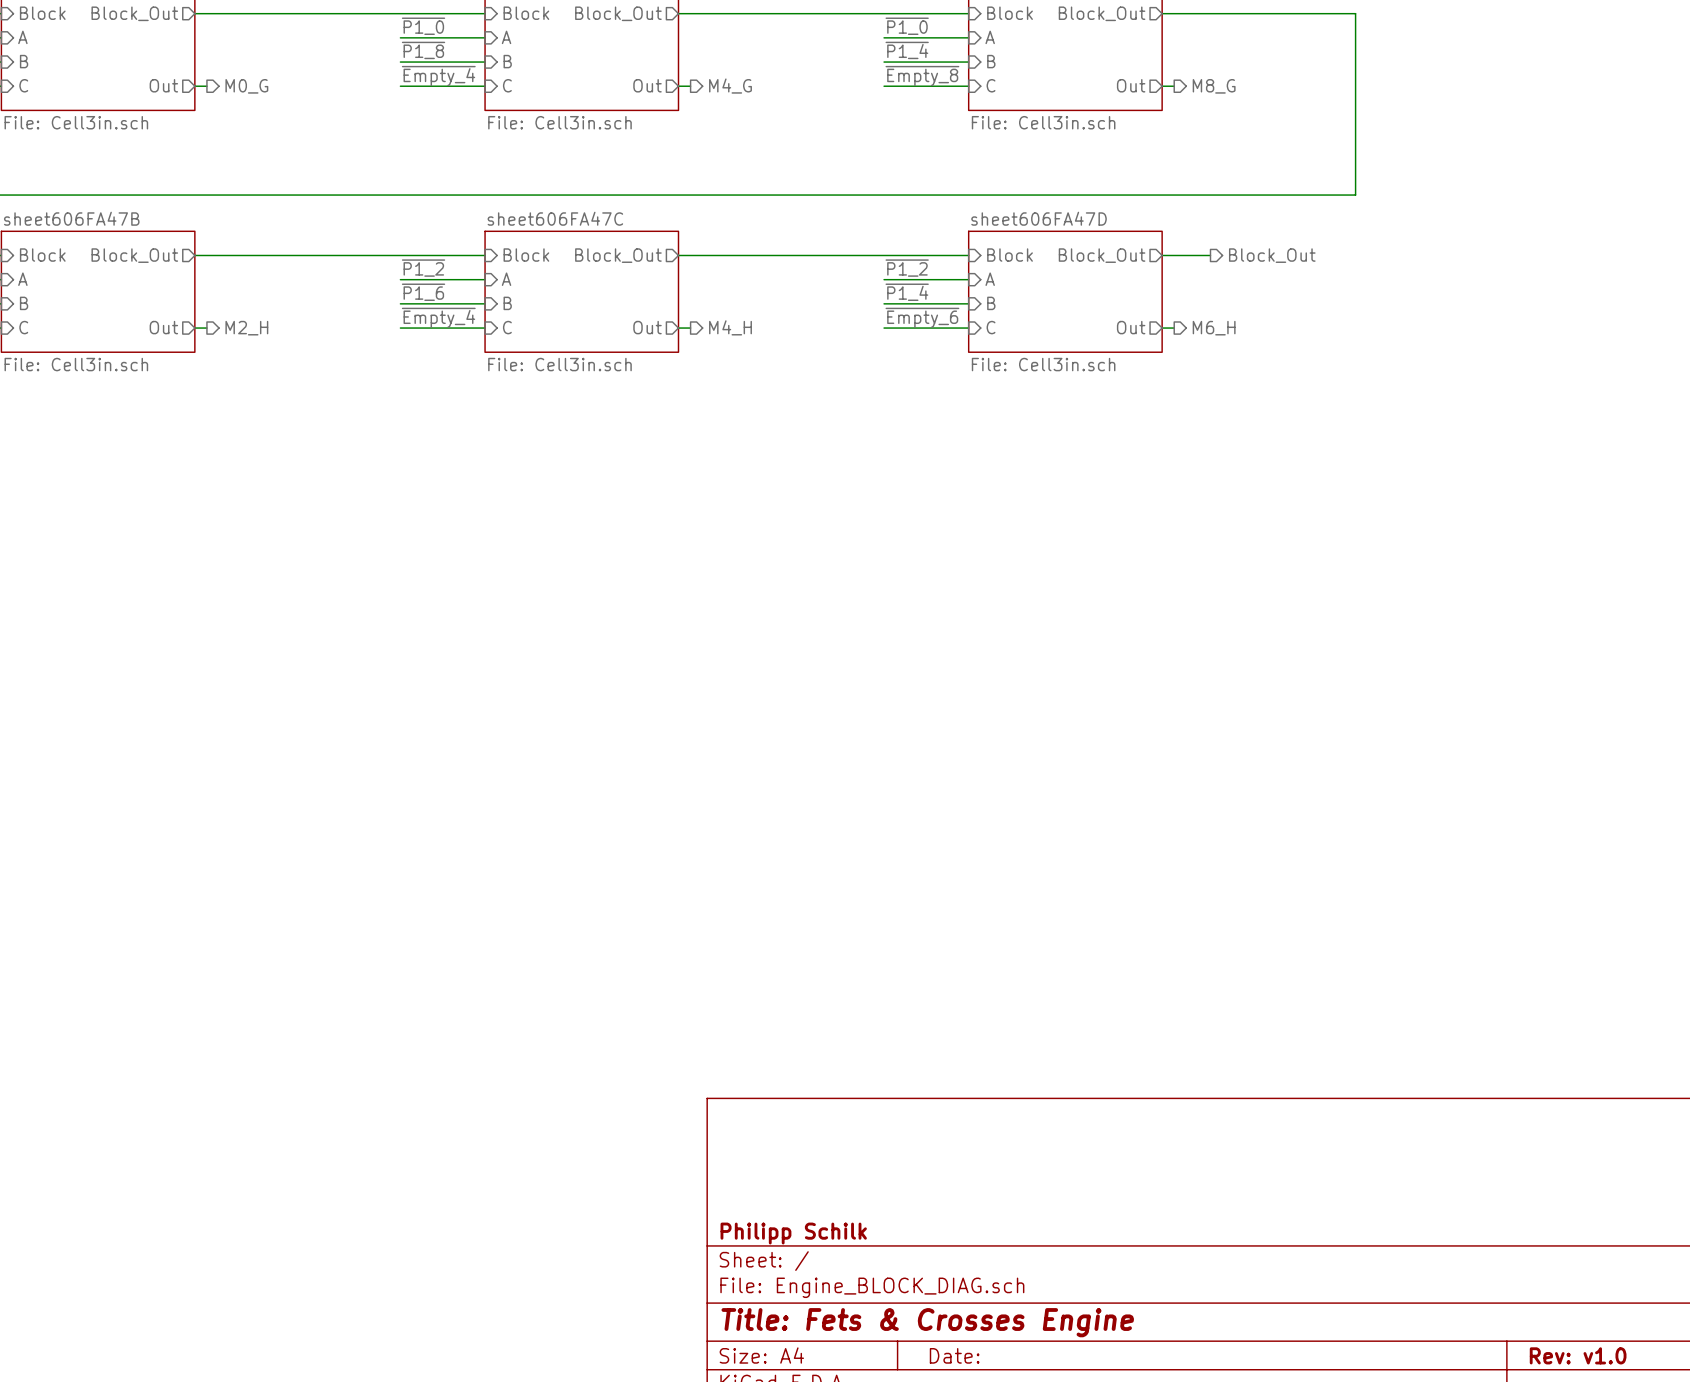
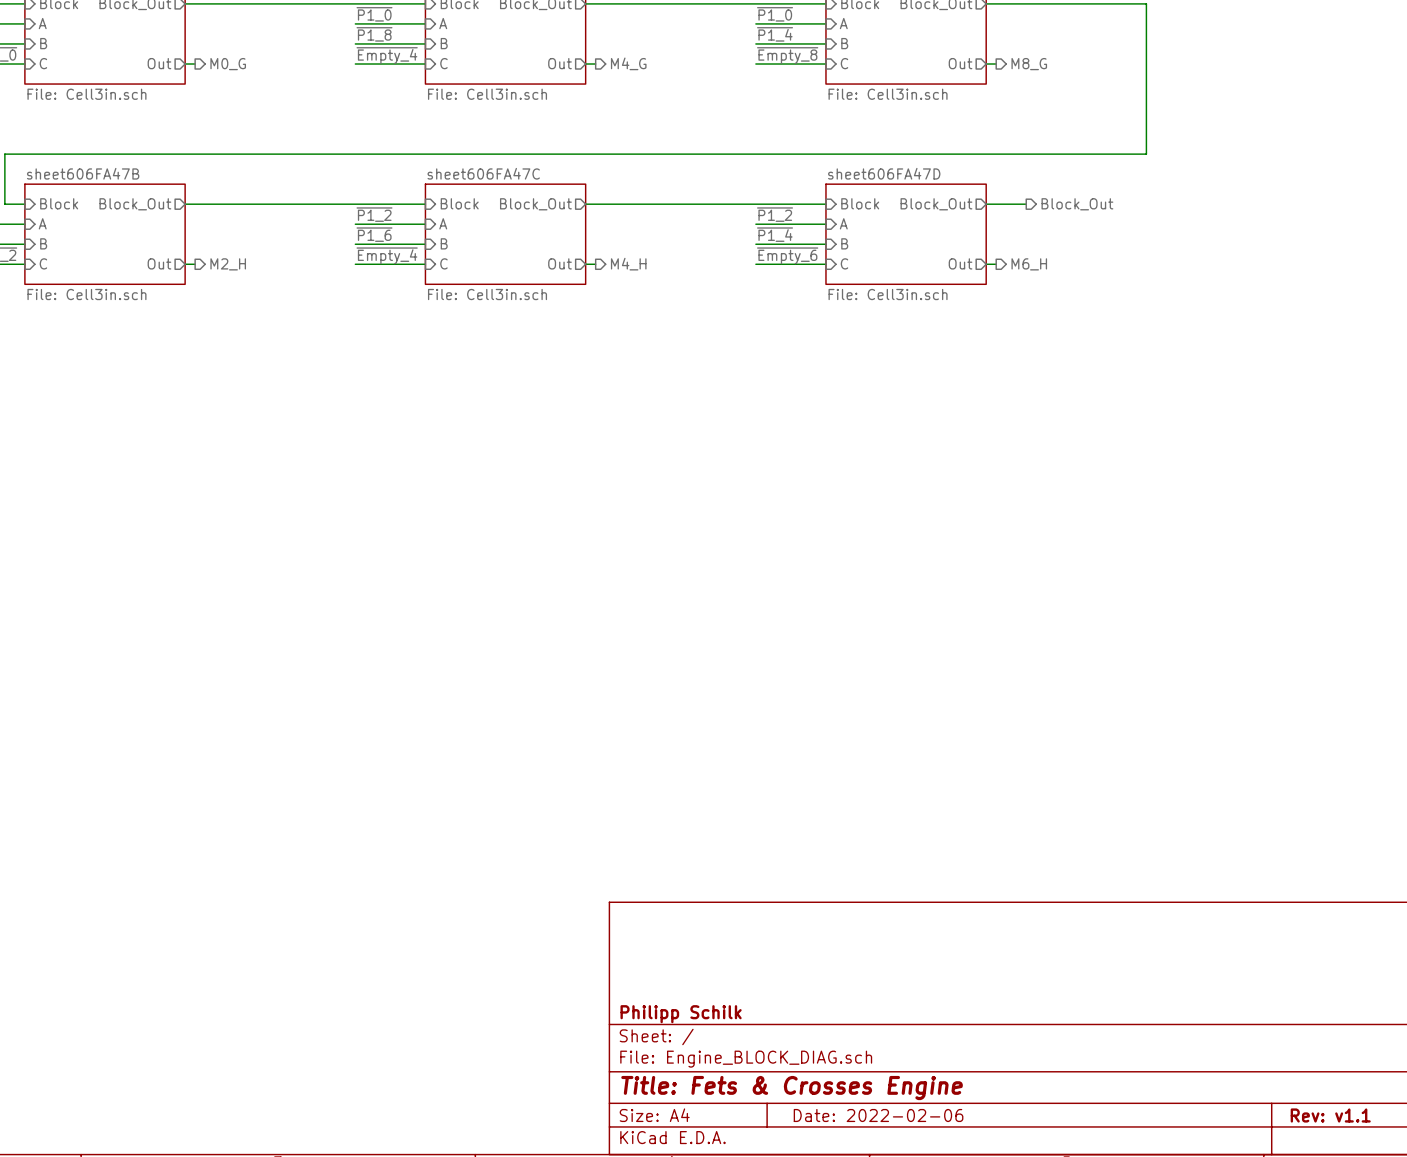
title block: Date: (954, 1355) -> Date: 2022-02-06 (878, 1115)
title block: Rev: v1.0 (1578, 1355) -> Rev: v1.1 (1330, 1115)

